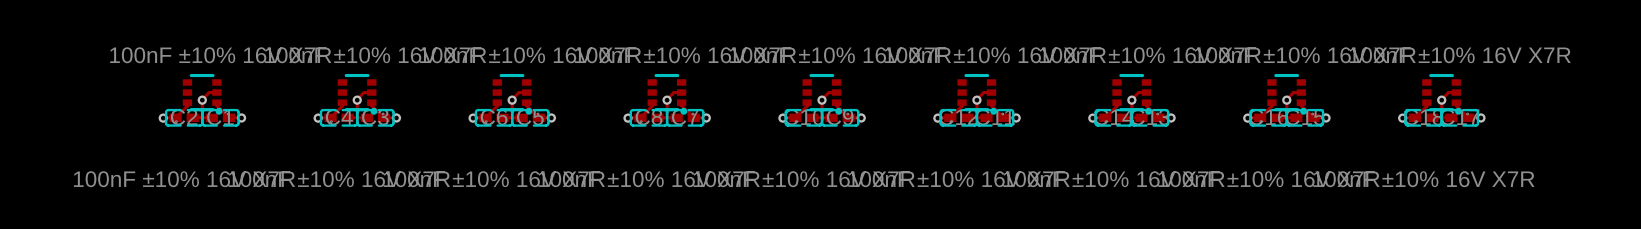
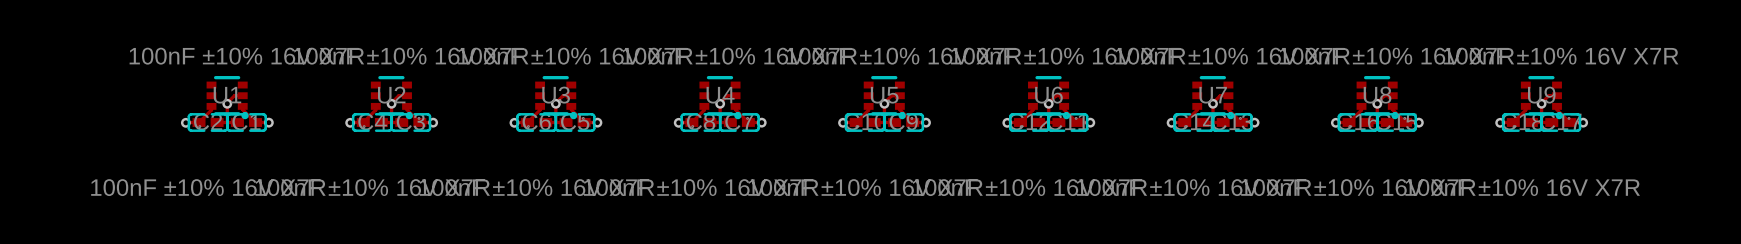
U2 name: none -> U2 (391, 95)
U3 name: none -> U3 (556, 95)
U6 name: none -> U6 (1048, 95)
U8 name: none -> U8 (1377, 95)
U9 name: none -> U9 (1541, 95)
U1 name: none -> U1 (227, 95)
U4 name: none -> U4 (720, 95)
U5 name: none -> U5 (884, 95)
U7 name: none -> U7 (1213, 95)

